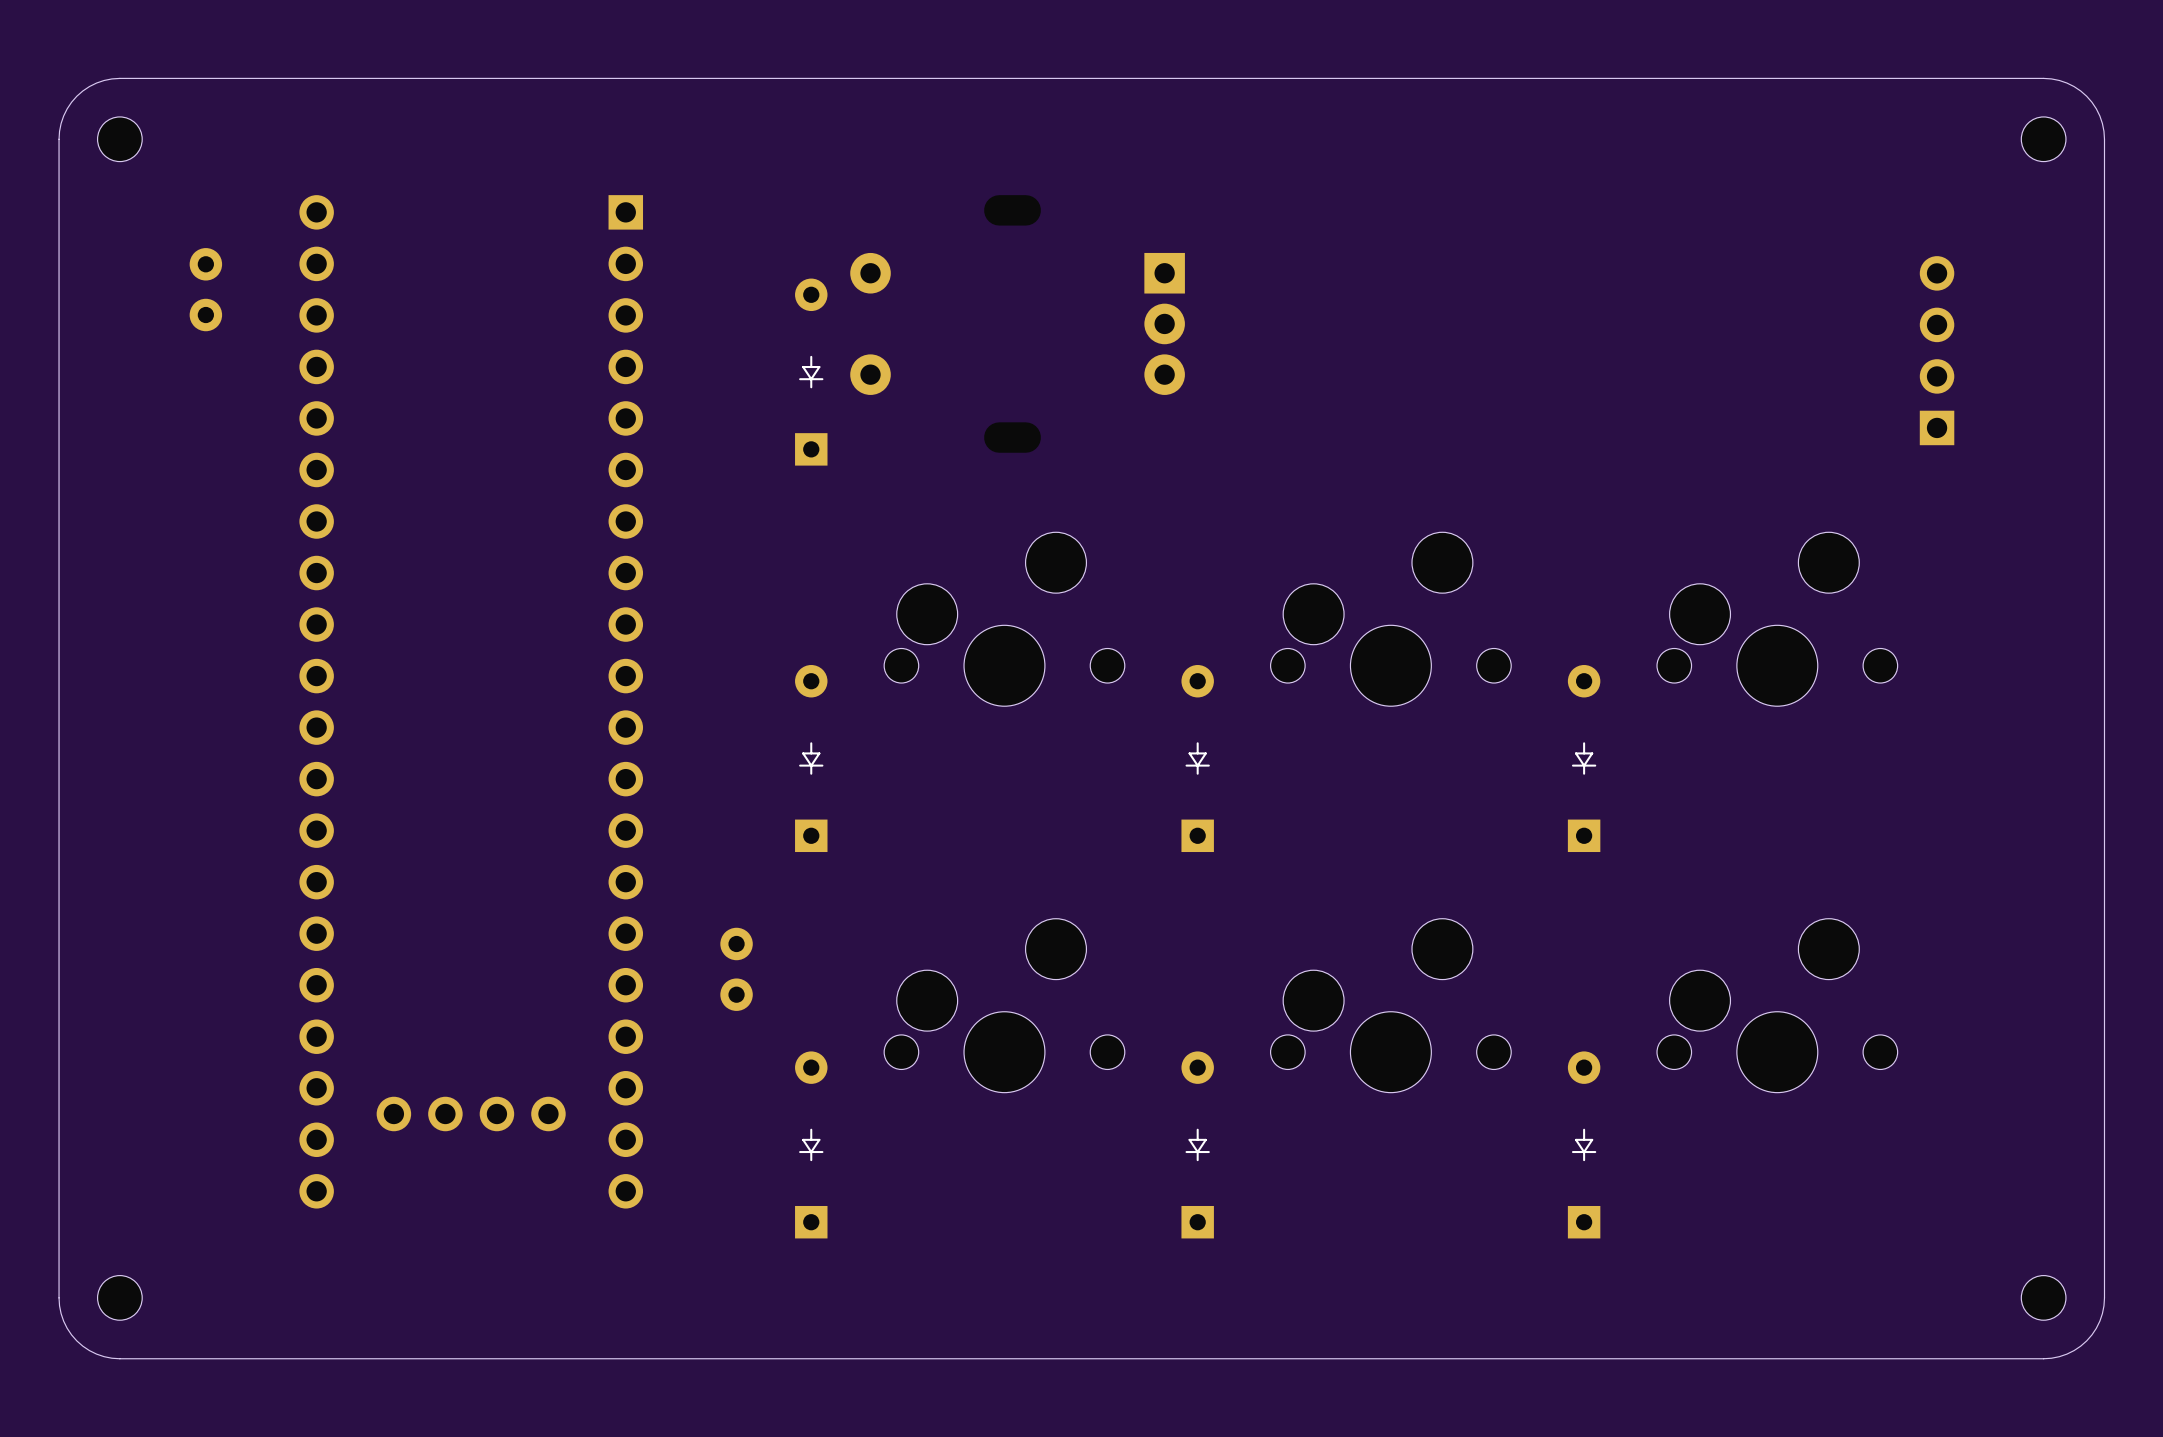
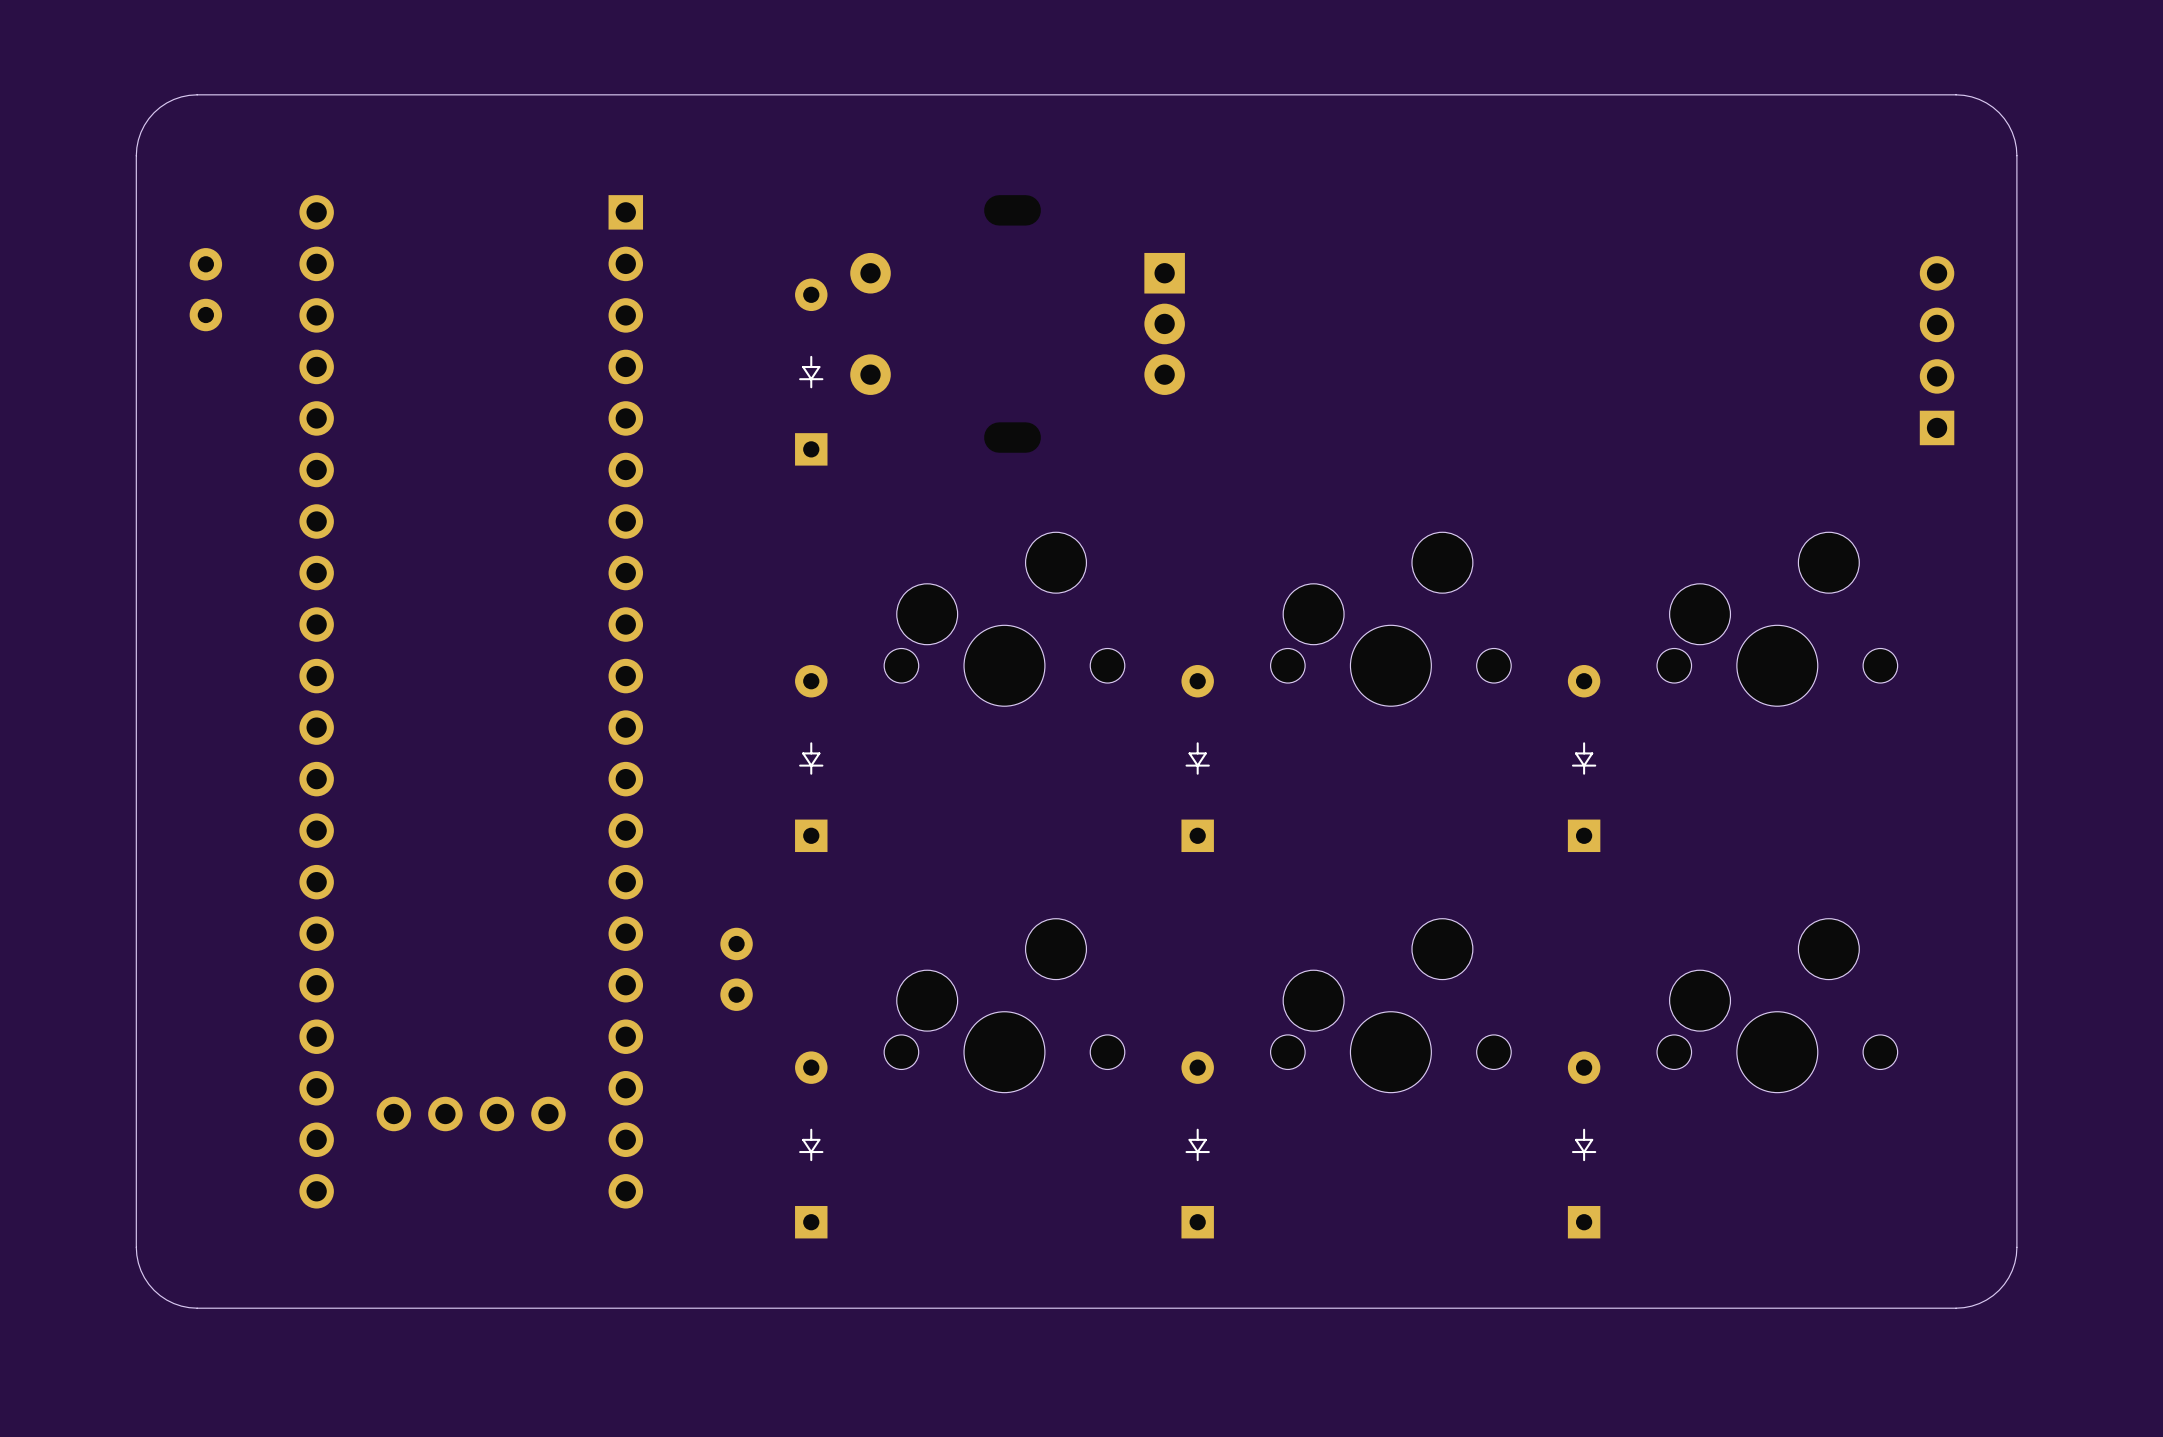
board edge: (2043, 78) (119, 78) (104, 80) (89, 86) (76, 96) (67, 108) (61, 123) (59, 139) (59, 1297) (61, 1313) (67, 1328) (76, 1340) (89, 1350) (104, 1356) (119, 1358) (2043, 1358) (2059, 1356) (2074, 1350) (2086, 1340) (2096, 1328) (2102, 1313) (2104, 1297) (2104, 139) (2099, 115) (2086, 96) (2066, 83) (2043, 78) -> (1956, 94) (1979, 99) (1999, 112) (2012, 132) (2016, 155) (2016, 1247) (2014, 1263) (2008, 1277) (1999, 1290) (1986, 1300) (1971, 1306) (1956, 1308) (197, 1308) (181, 1306) (166, 1300) (154, 1290) (144, 1277) (138, 1263) (136, 1247) (136, 155) (138, 139) (144, 125) (154, 112) (166, 102) (181, 96) (197, 94) (1956, 94)
part: (119, 139) -> none
part: (2043, 139) -> none
part: (119, 1297) -> none
part: (2043, 1297) -> none

